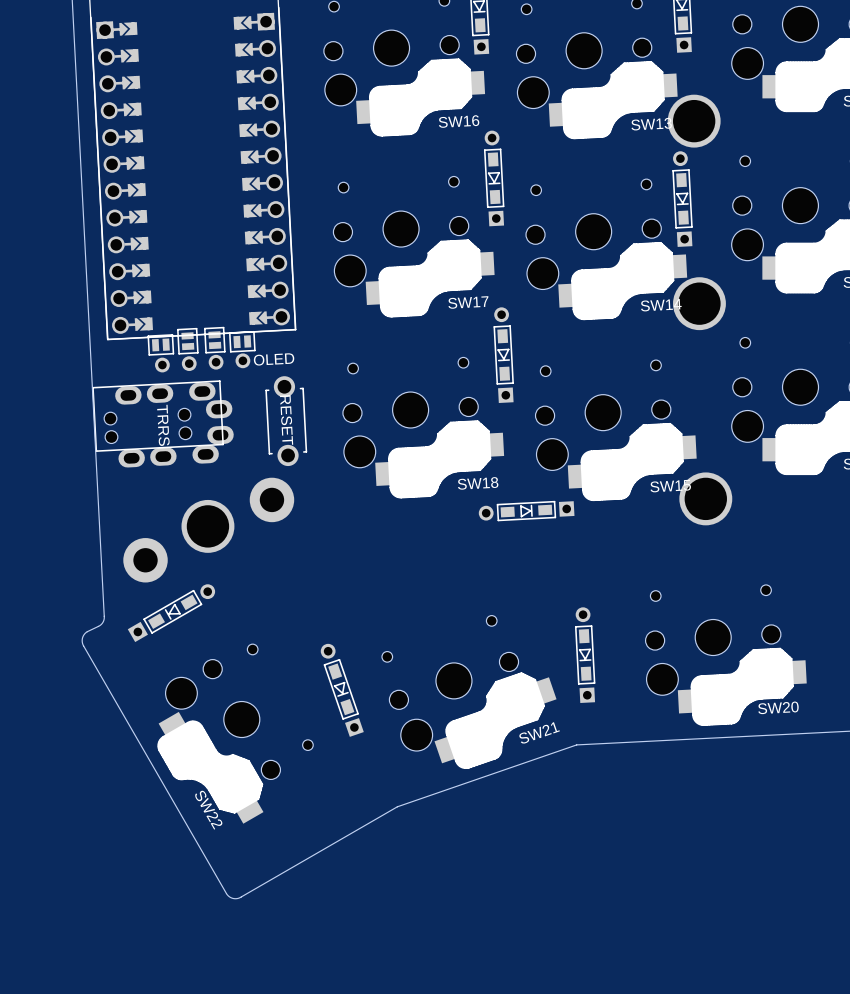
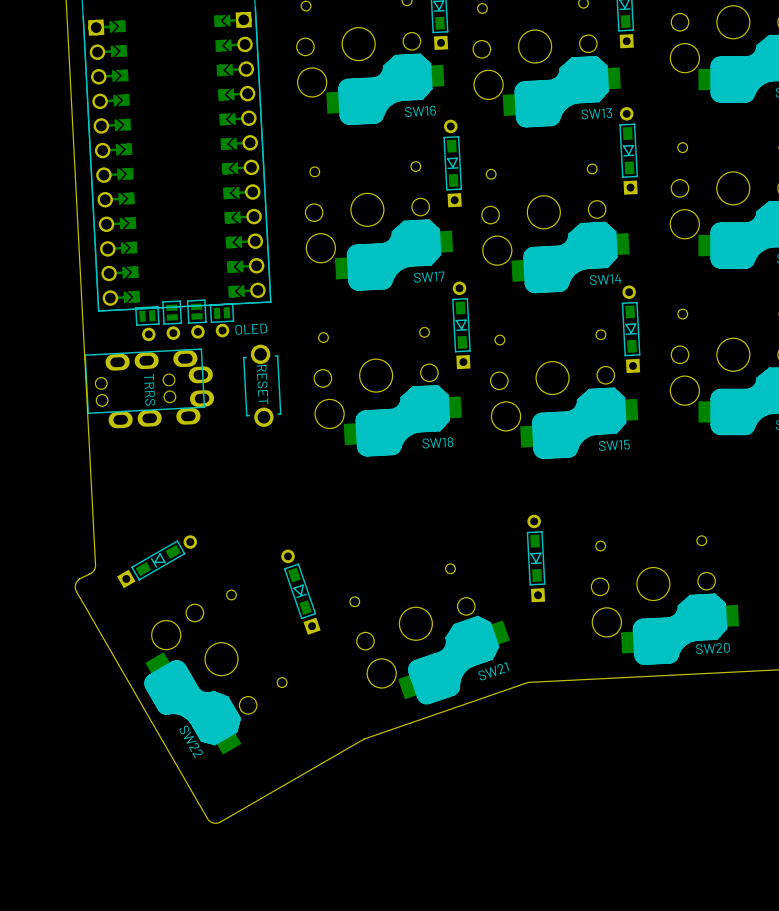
part: (694, 121) -> none
part position: (682, 199) -> (628, 150)
part: (699, 303) -> none
part: none -> (631, 329)
part: (705, 498) -> none
part: (271, 499) -> none
part: (526, 511) -> none
part: (207, 526) -> none
part: (145, 560) -> none
part position: (585, 655) -> (536, 558)
part position: (342, 690) -> (300, 592)

